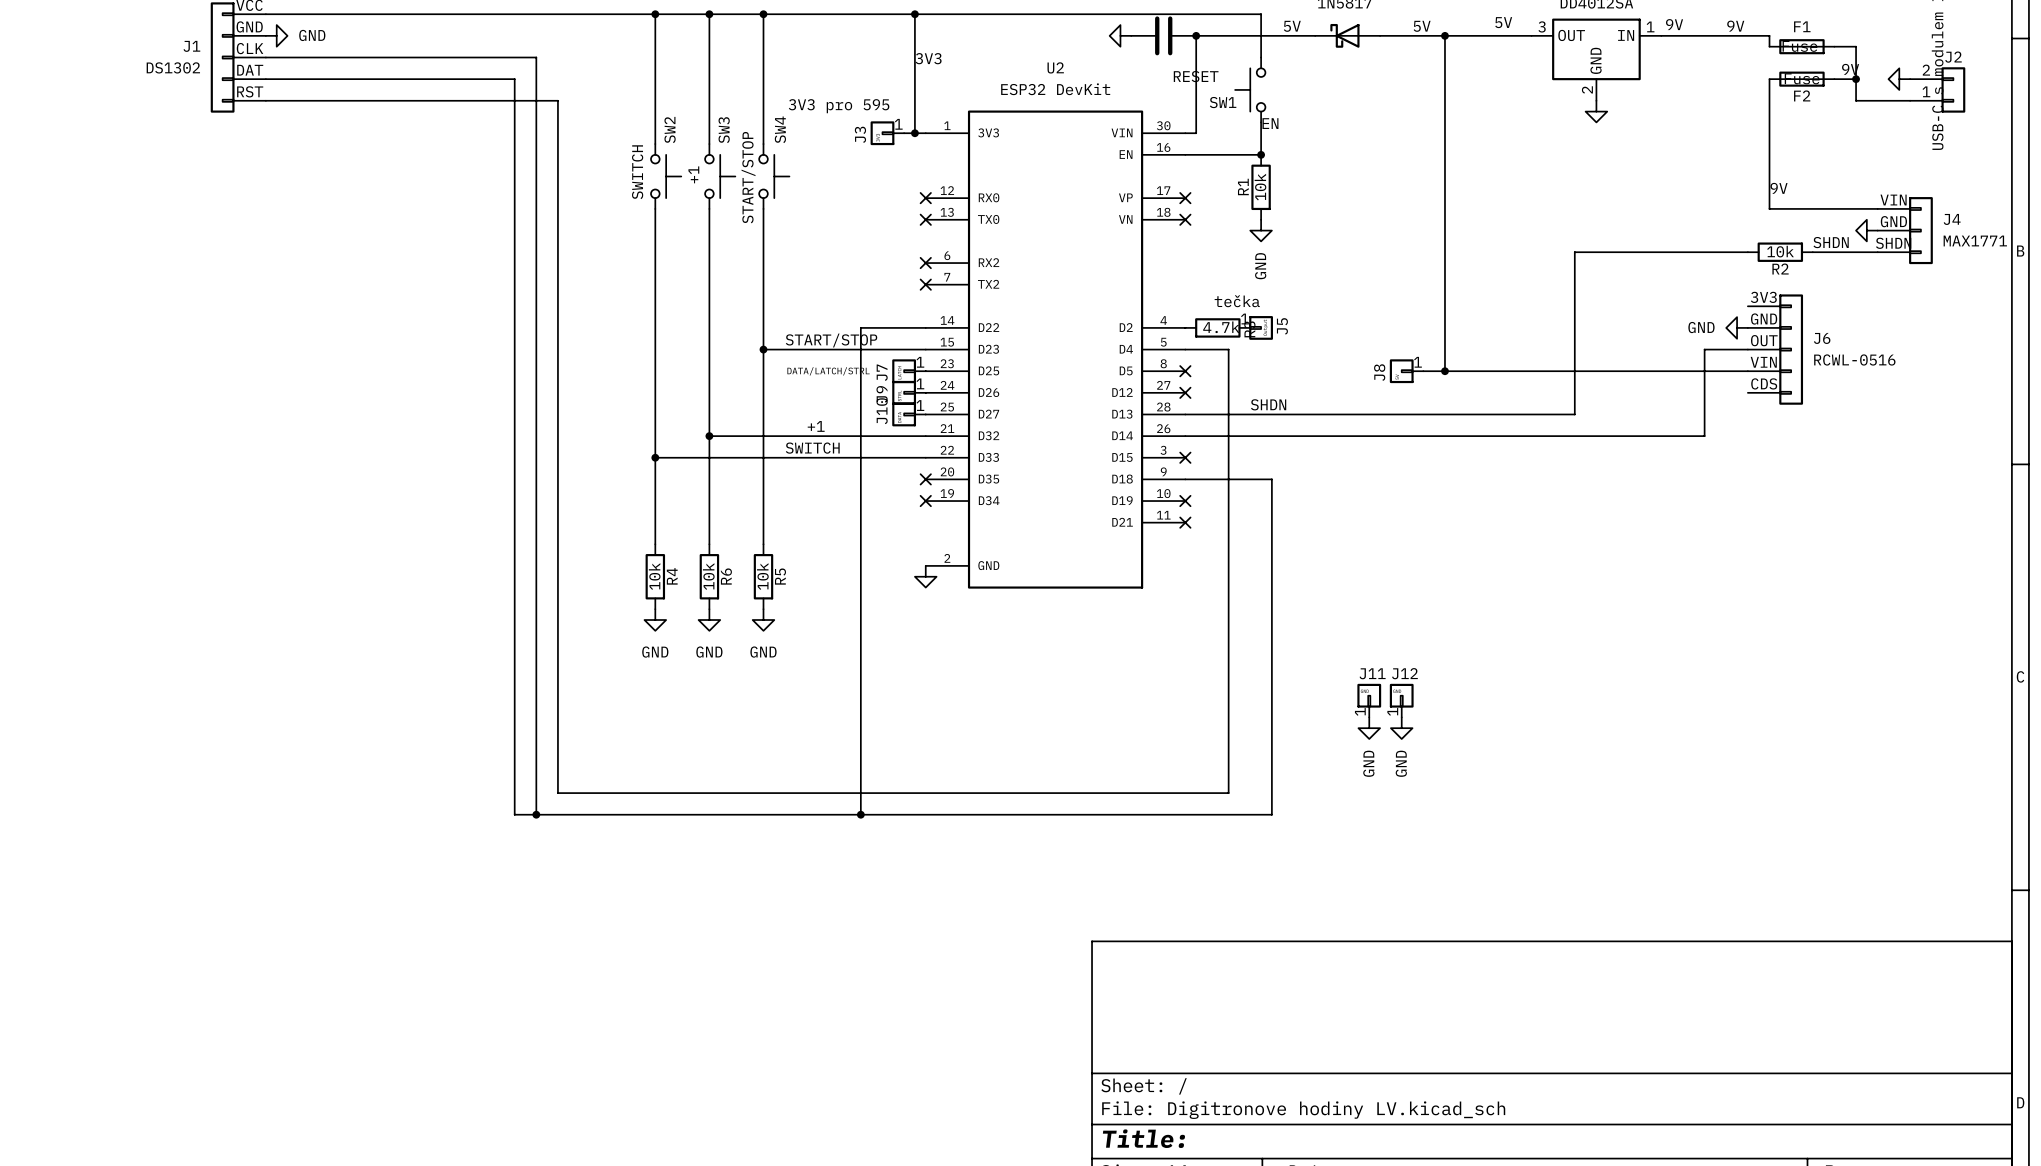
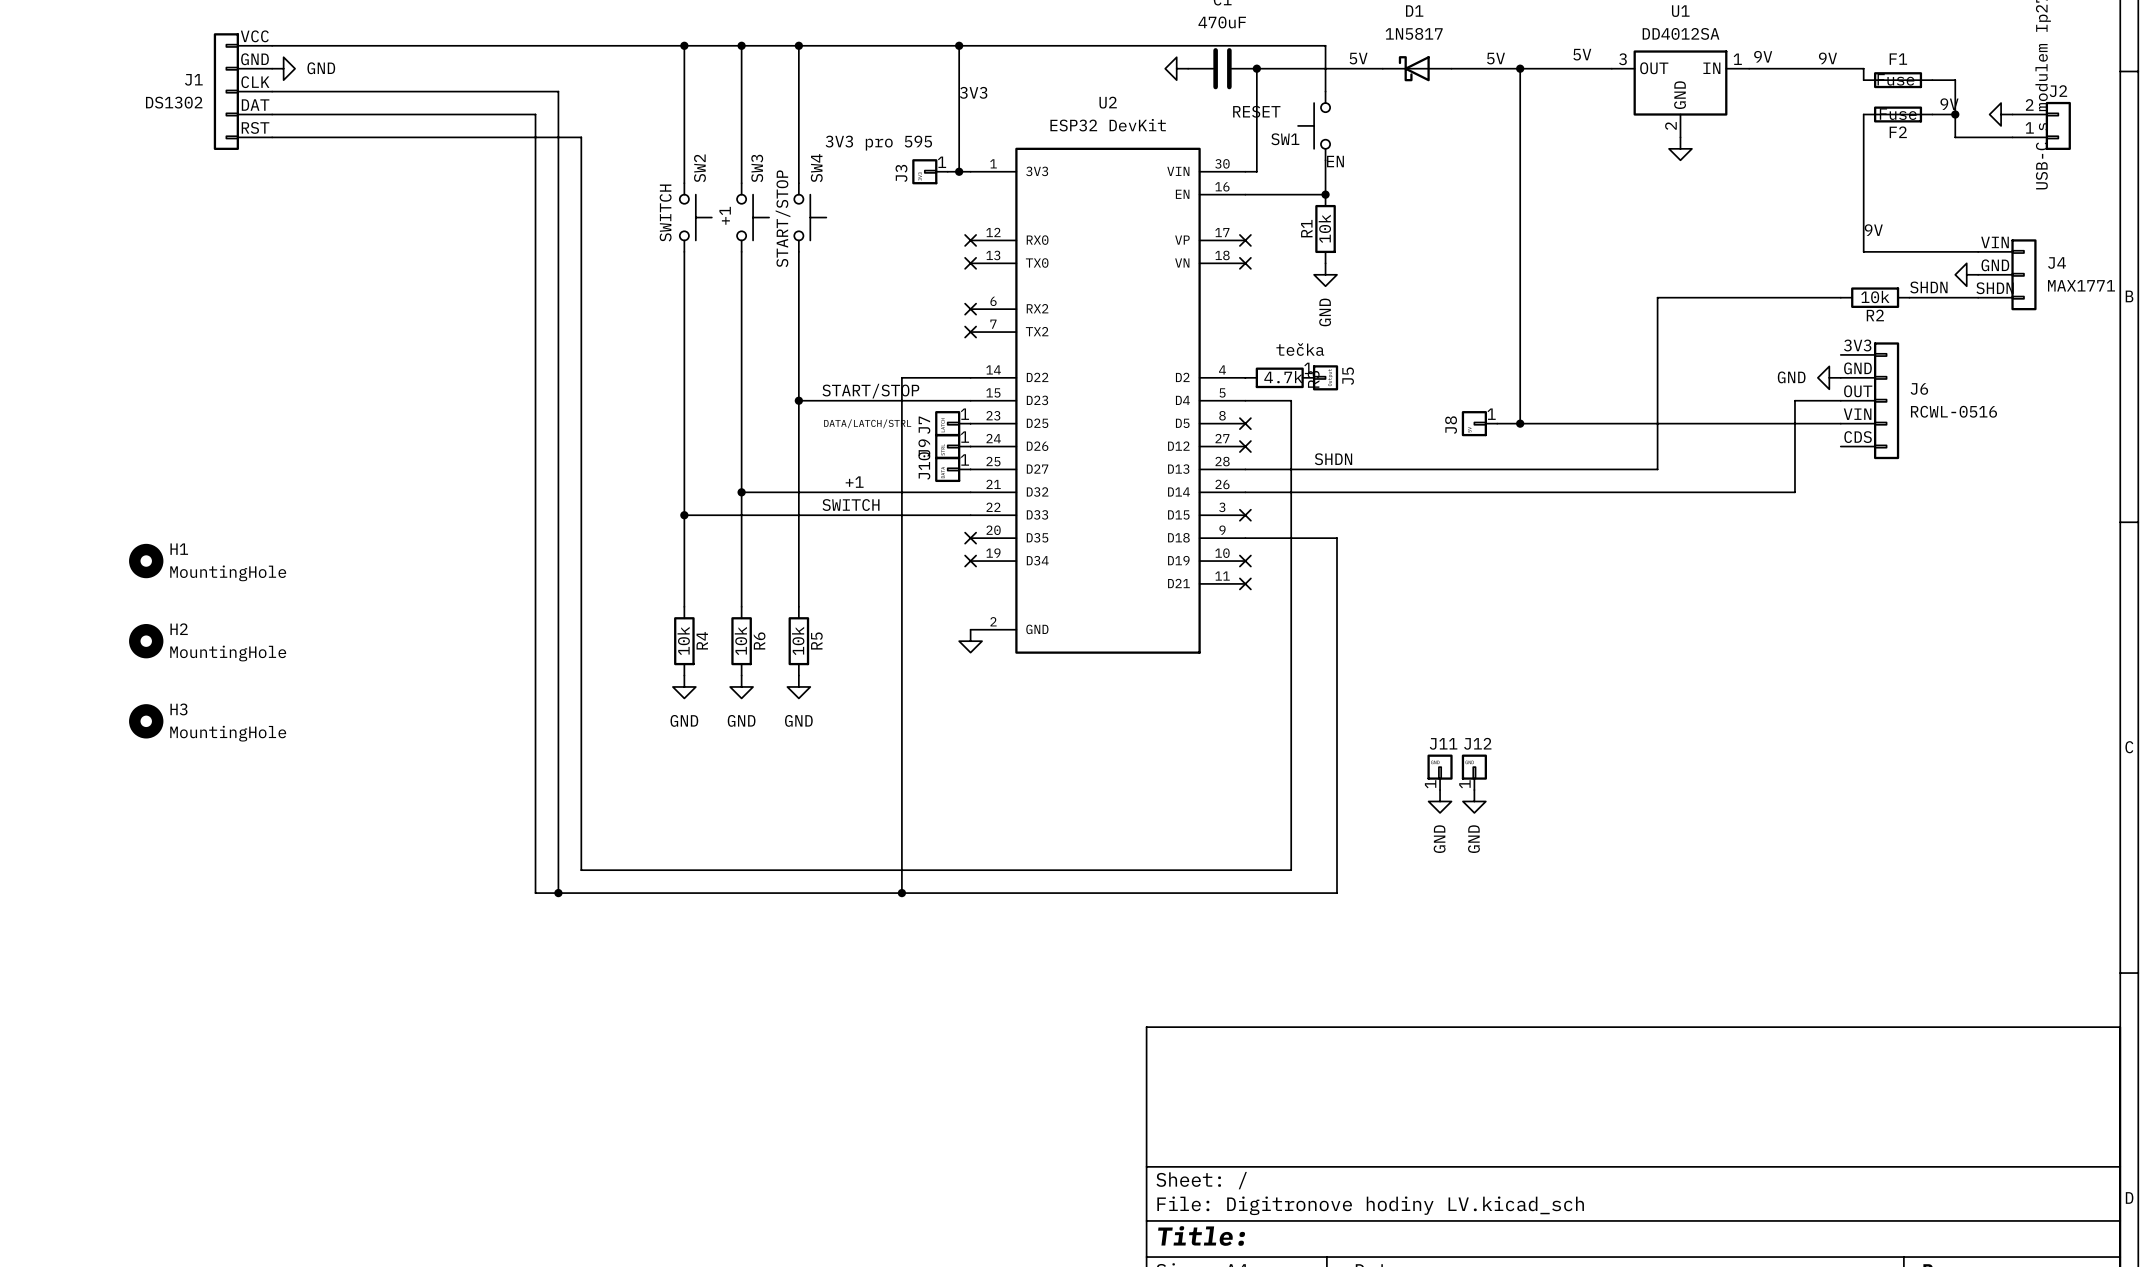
H1: none -> MountingHole (146, 561)
H2: none -> MountingHole (146, 641)
H3: none -> MountingHole (146, 721)

